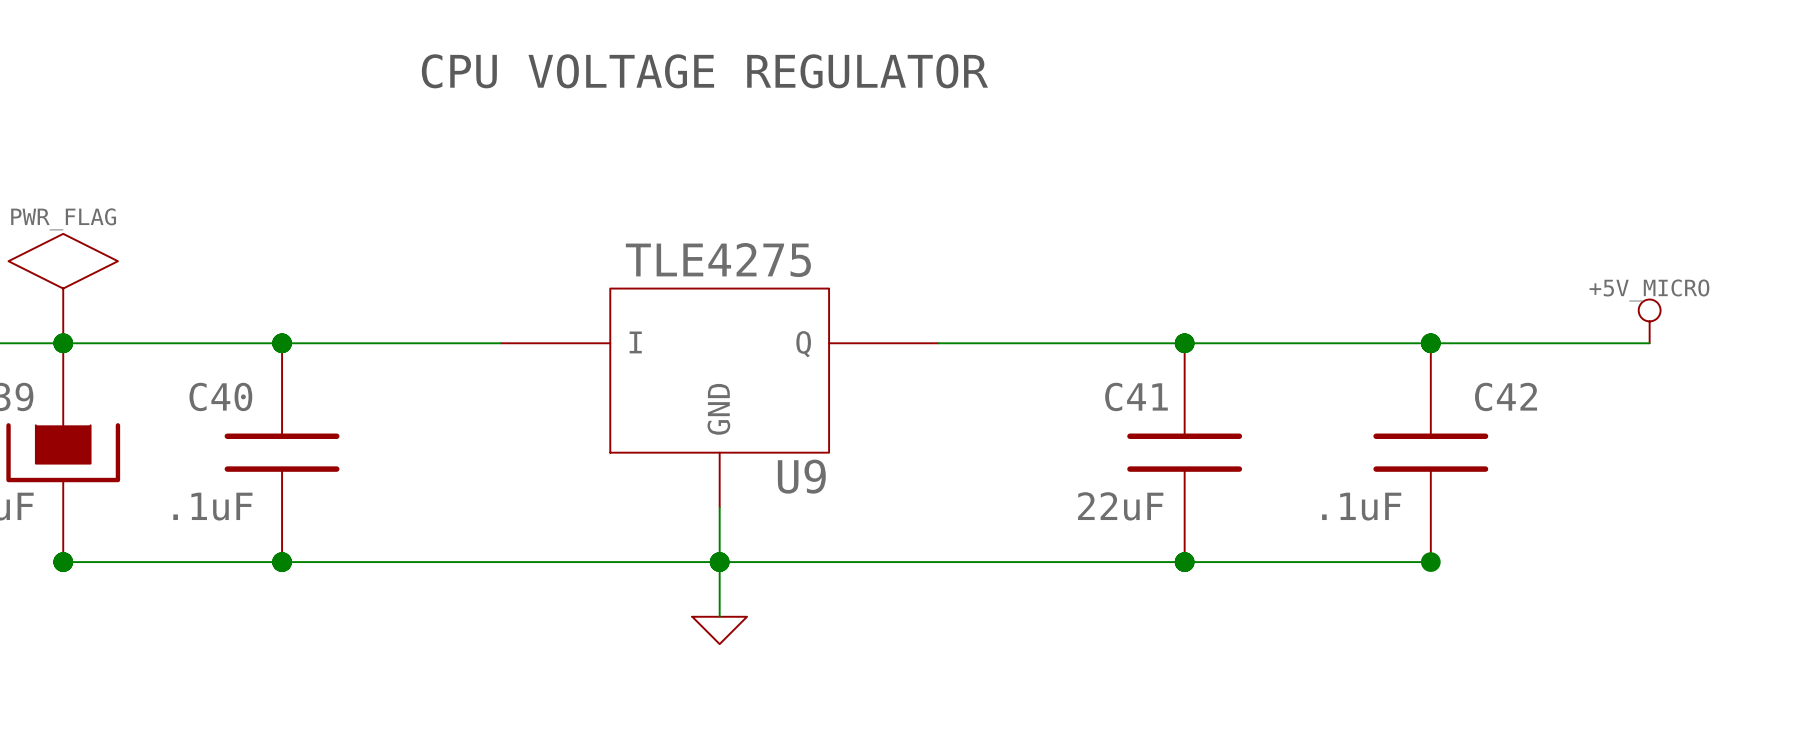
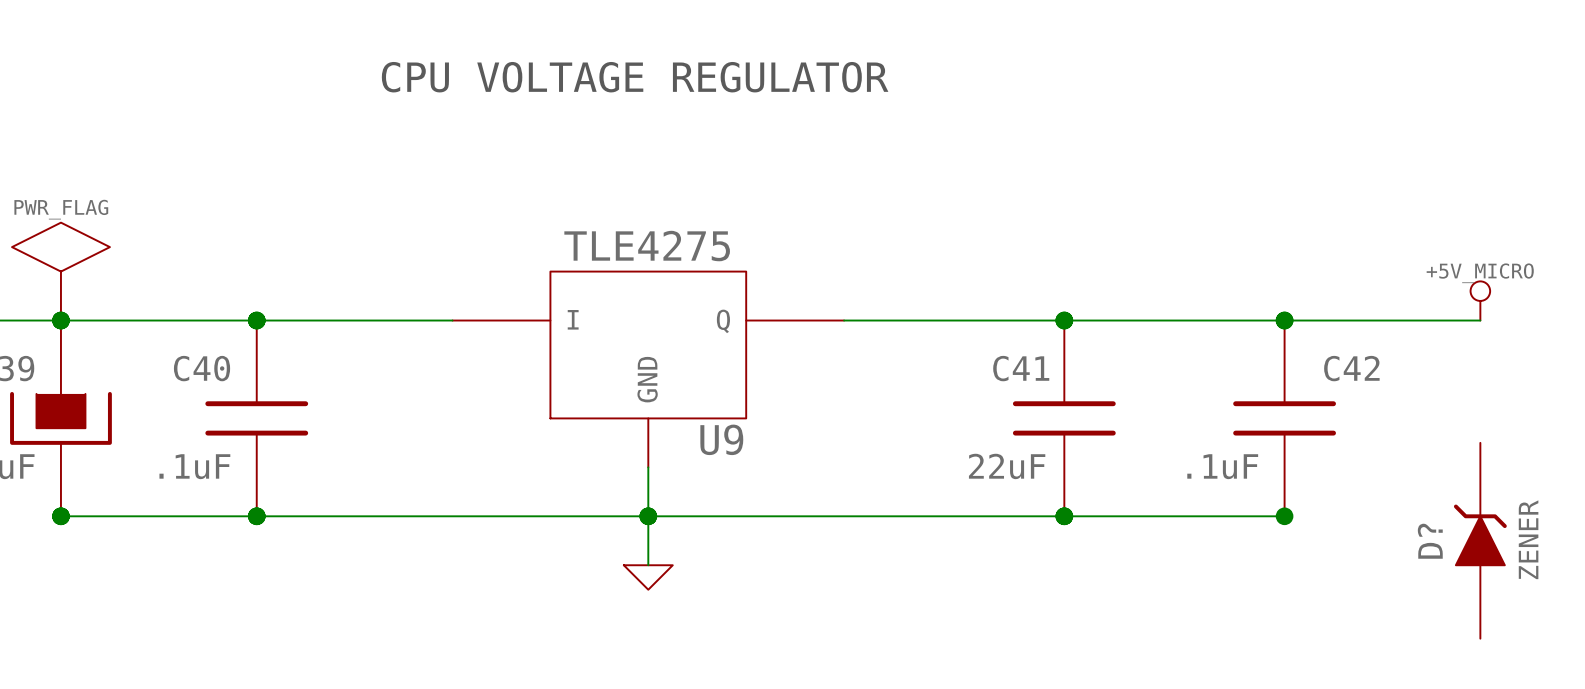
D?: none -> ZENER (1480, 540)

